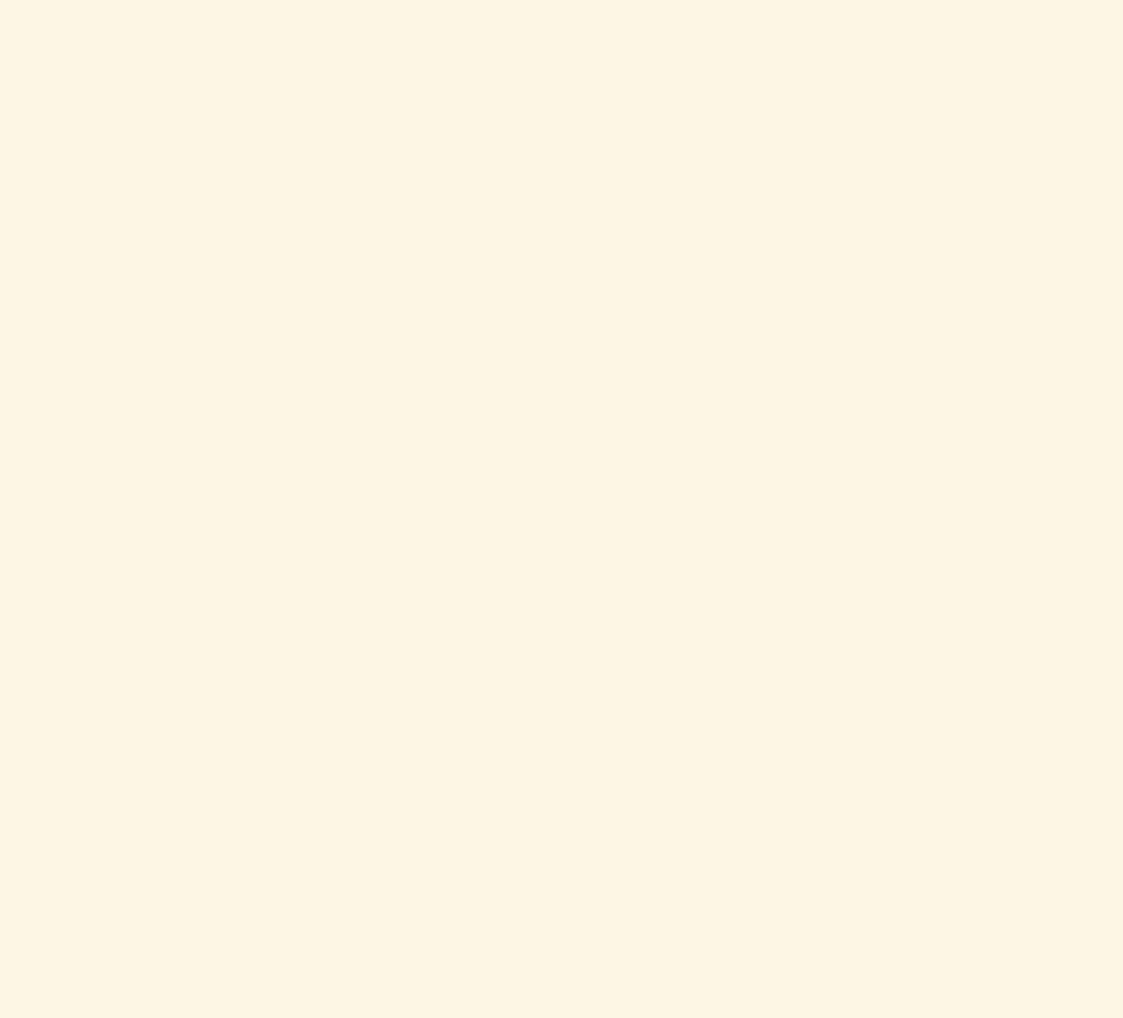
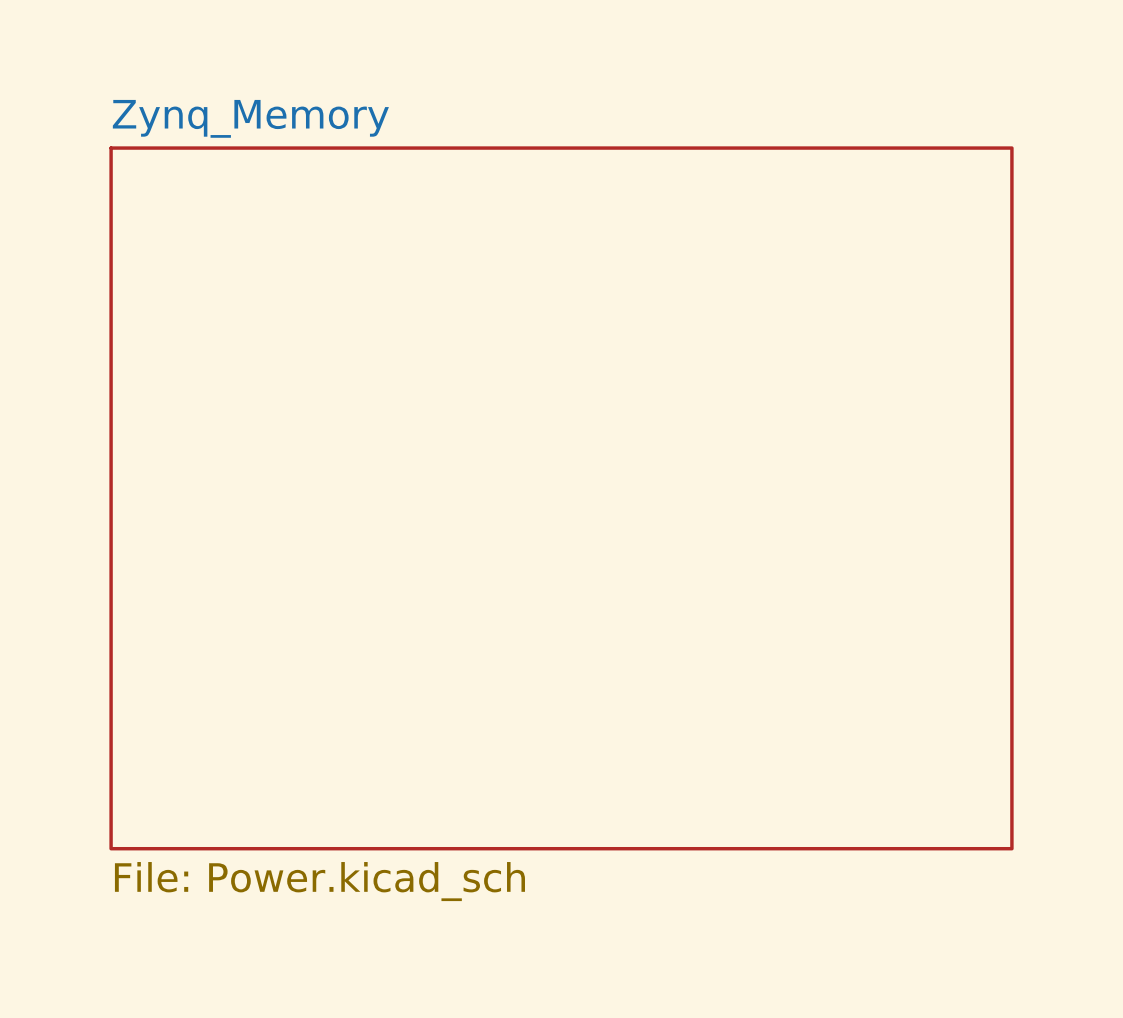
sheet Zynq_Memory: none -> File: Power.kicad_sch (561, 498)

